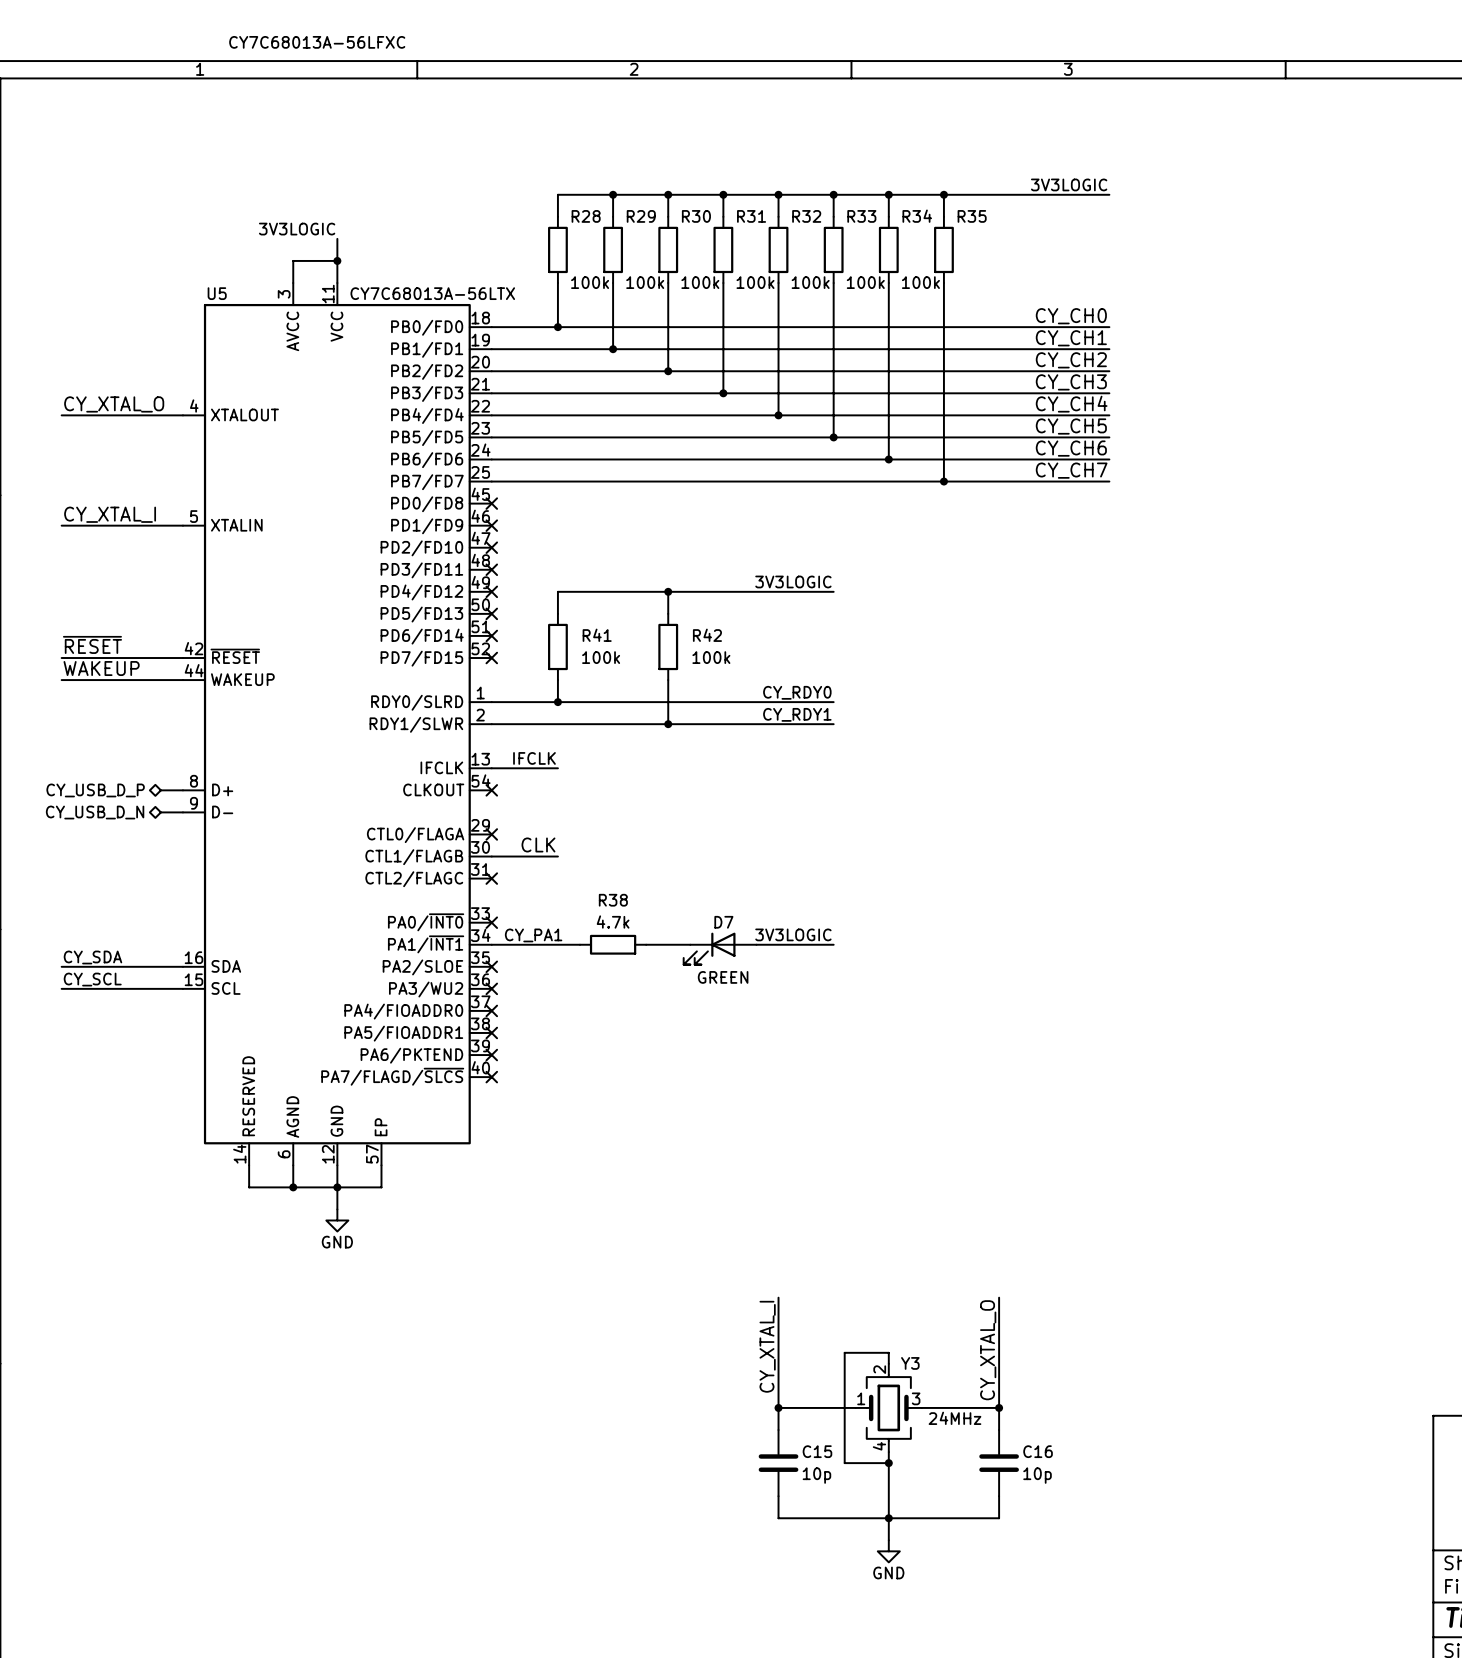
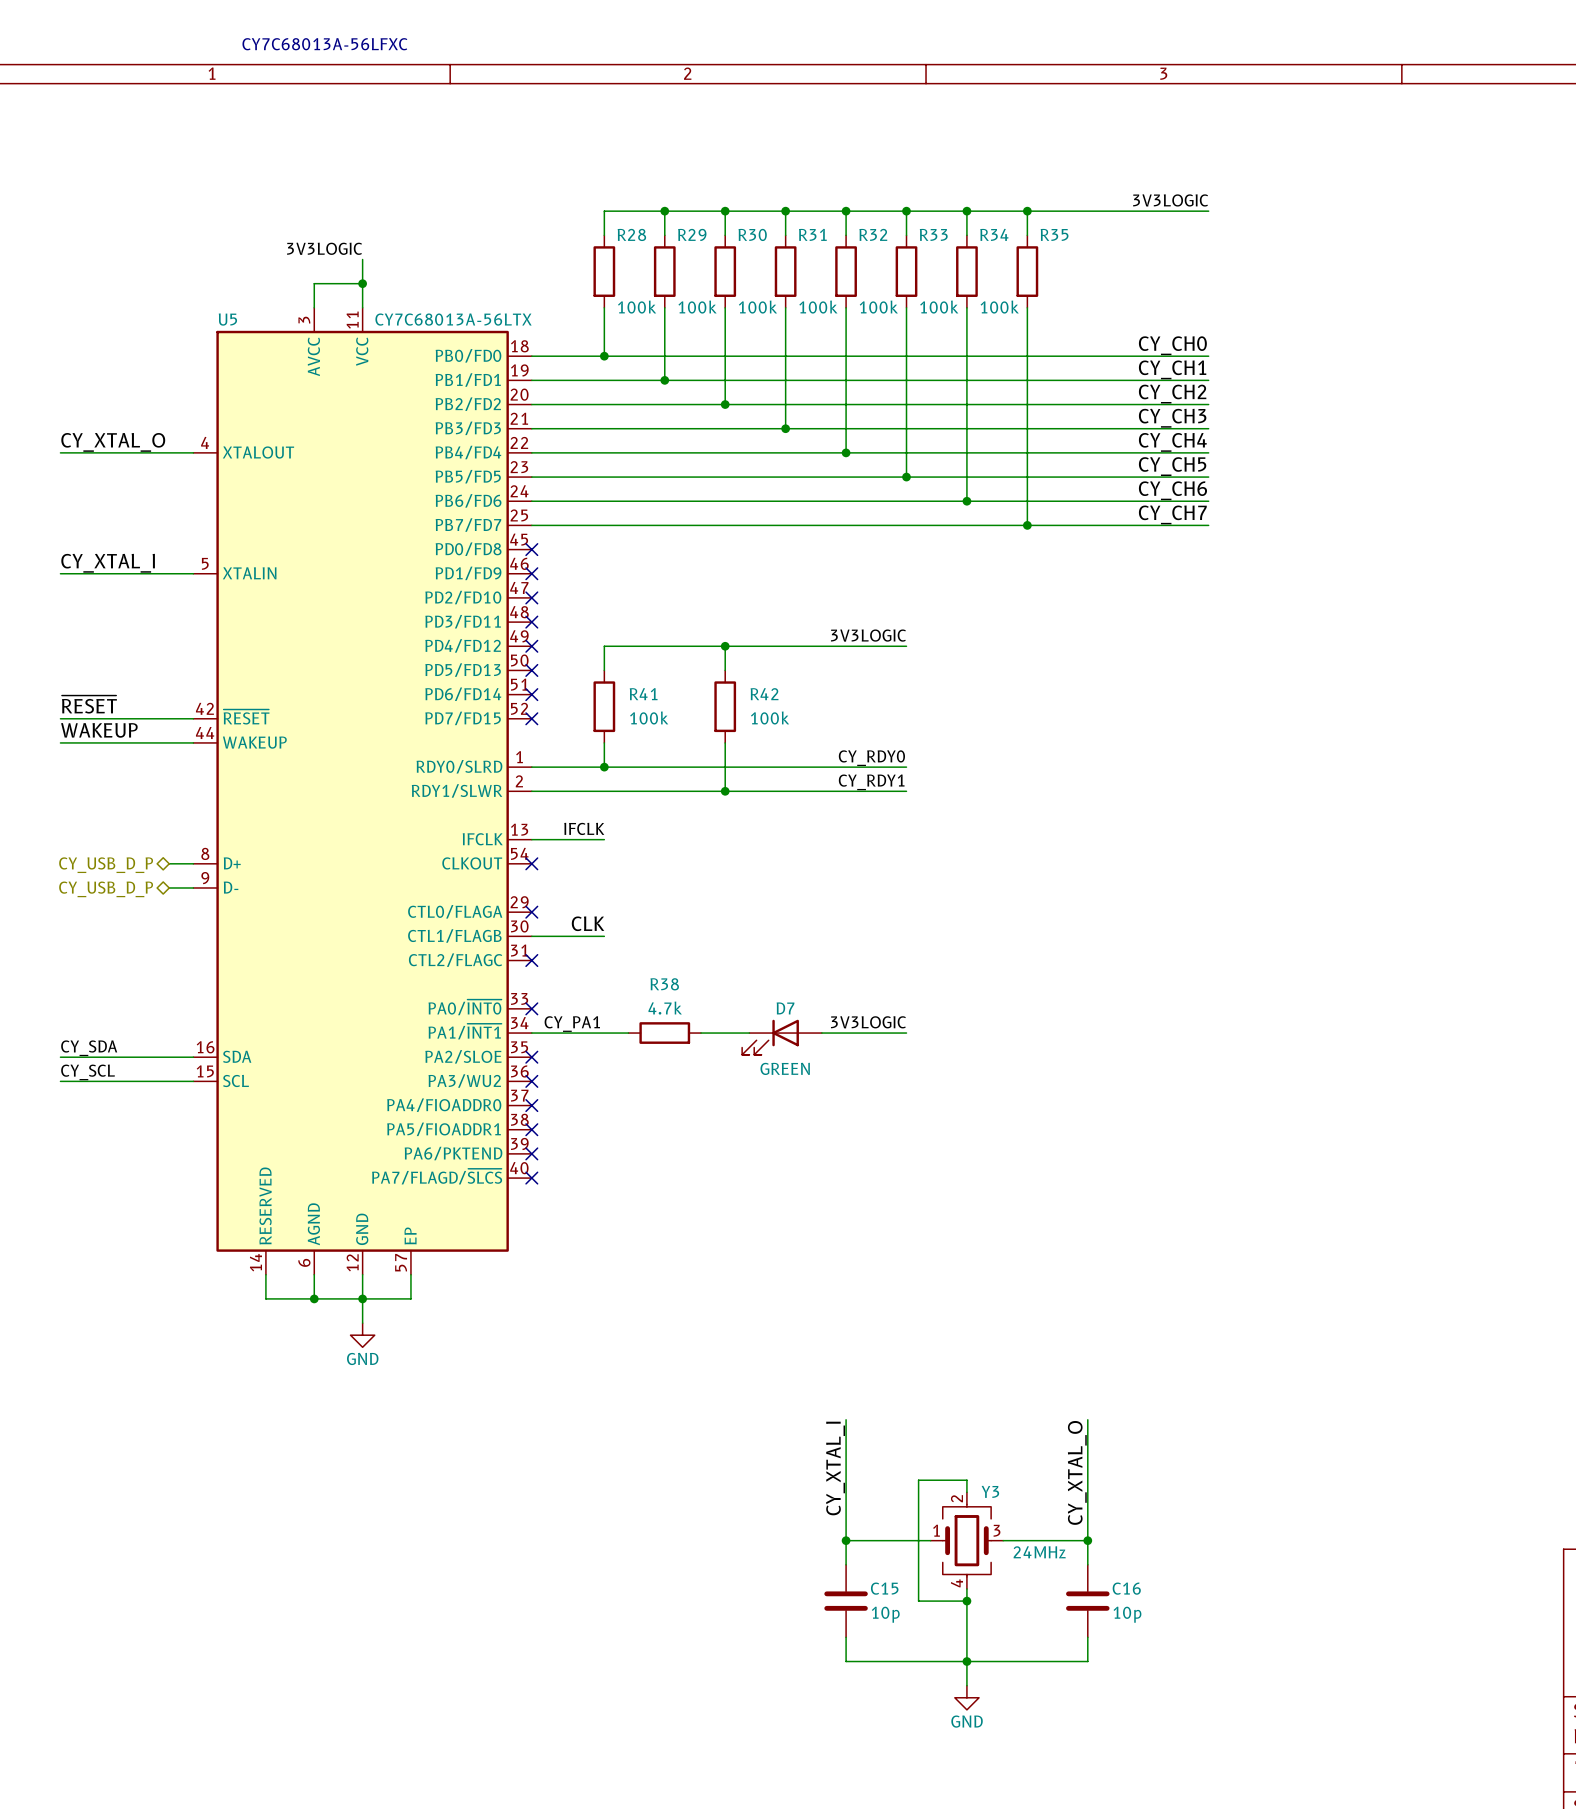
hierarchical label: CY_USB_D_N (95, 812) -> CY_USB_D_P (106, 889)

